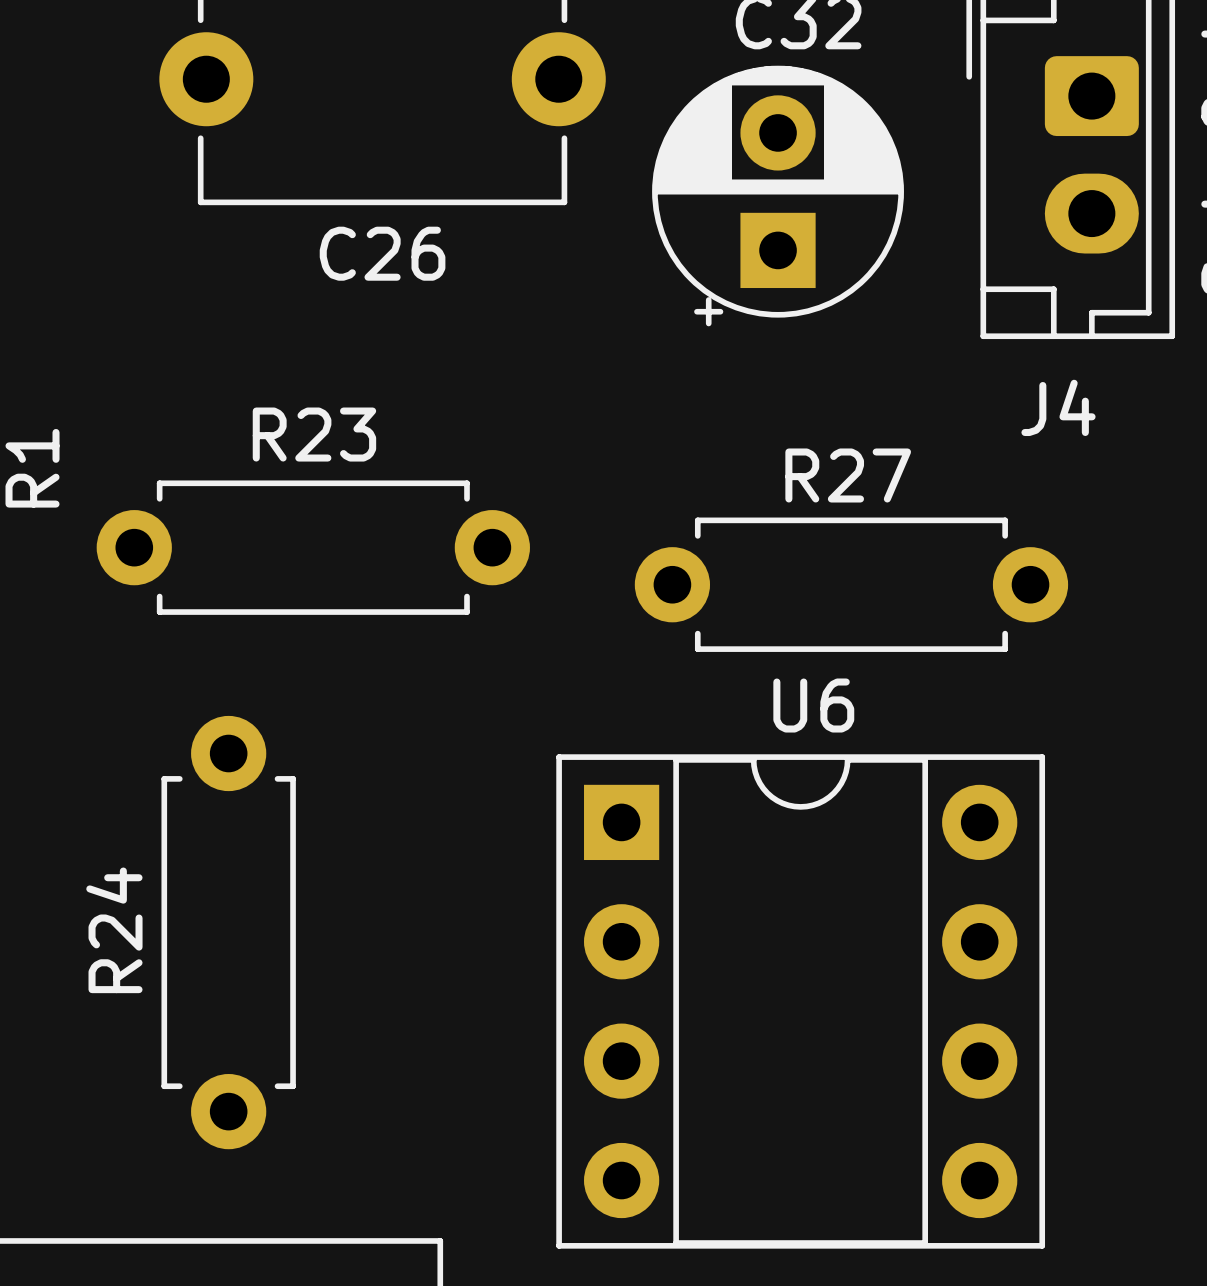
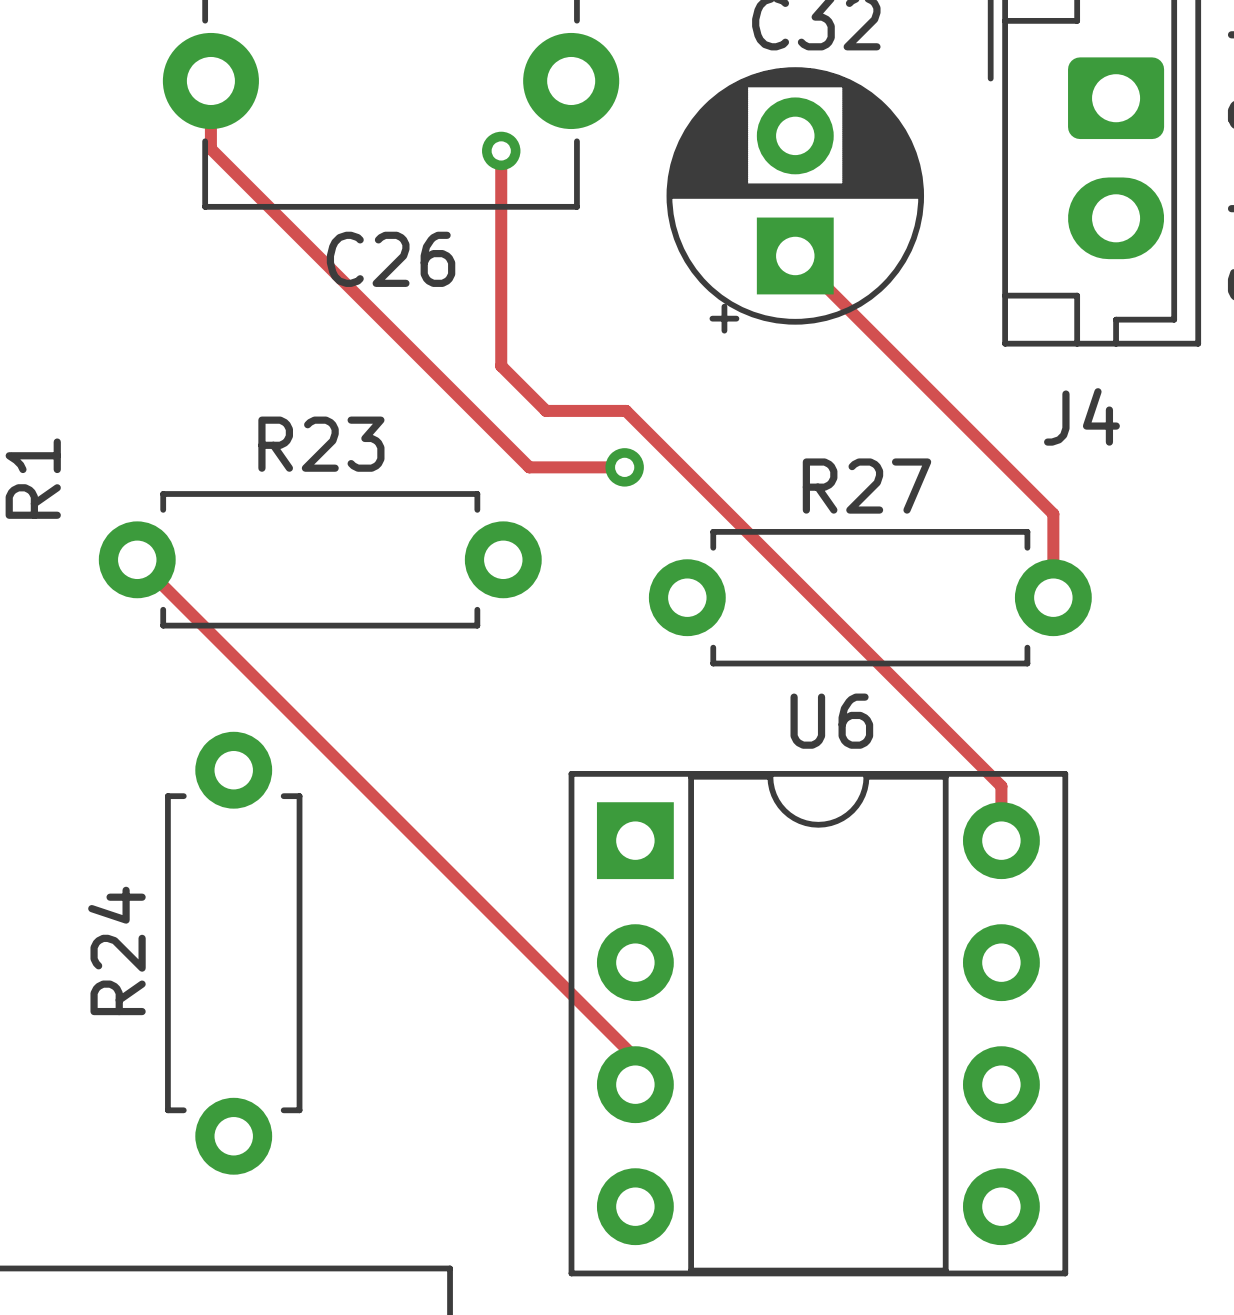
track: none -> (210, 80) (210, 148) (529, 467) (624, 467)
track: none -> (501, 150) (501, 366) (546, 410) (626, 410) (1001, 786) (1001, 840)
via: none -> (501, 150)
track: none -> (795, 255) (1053, 514) (1053, 597)
via: none -> (624, 467)
track: none -> (137, 559) (635, 1057) (635, 1084)

